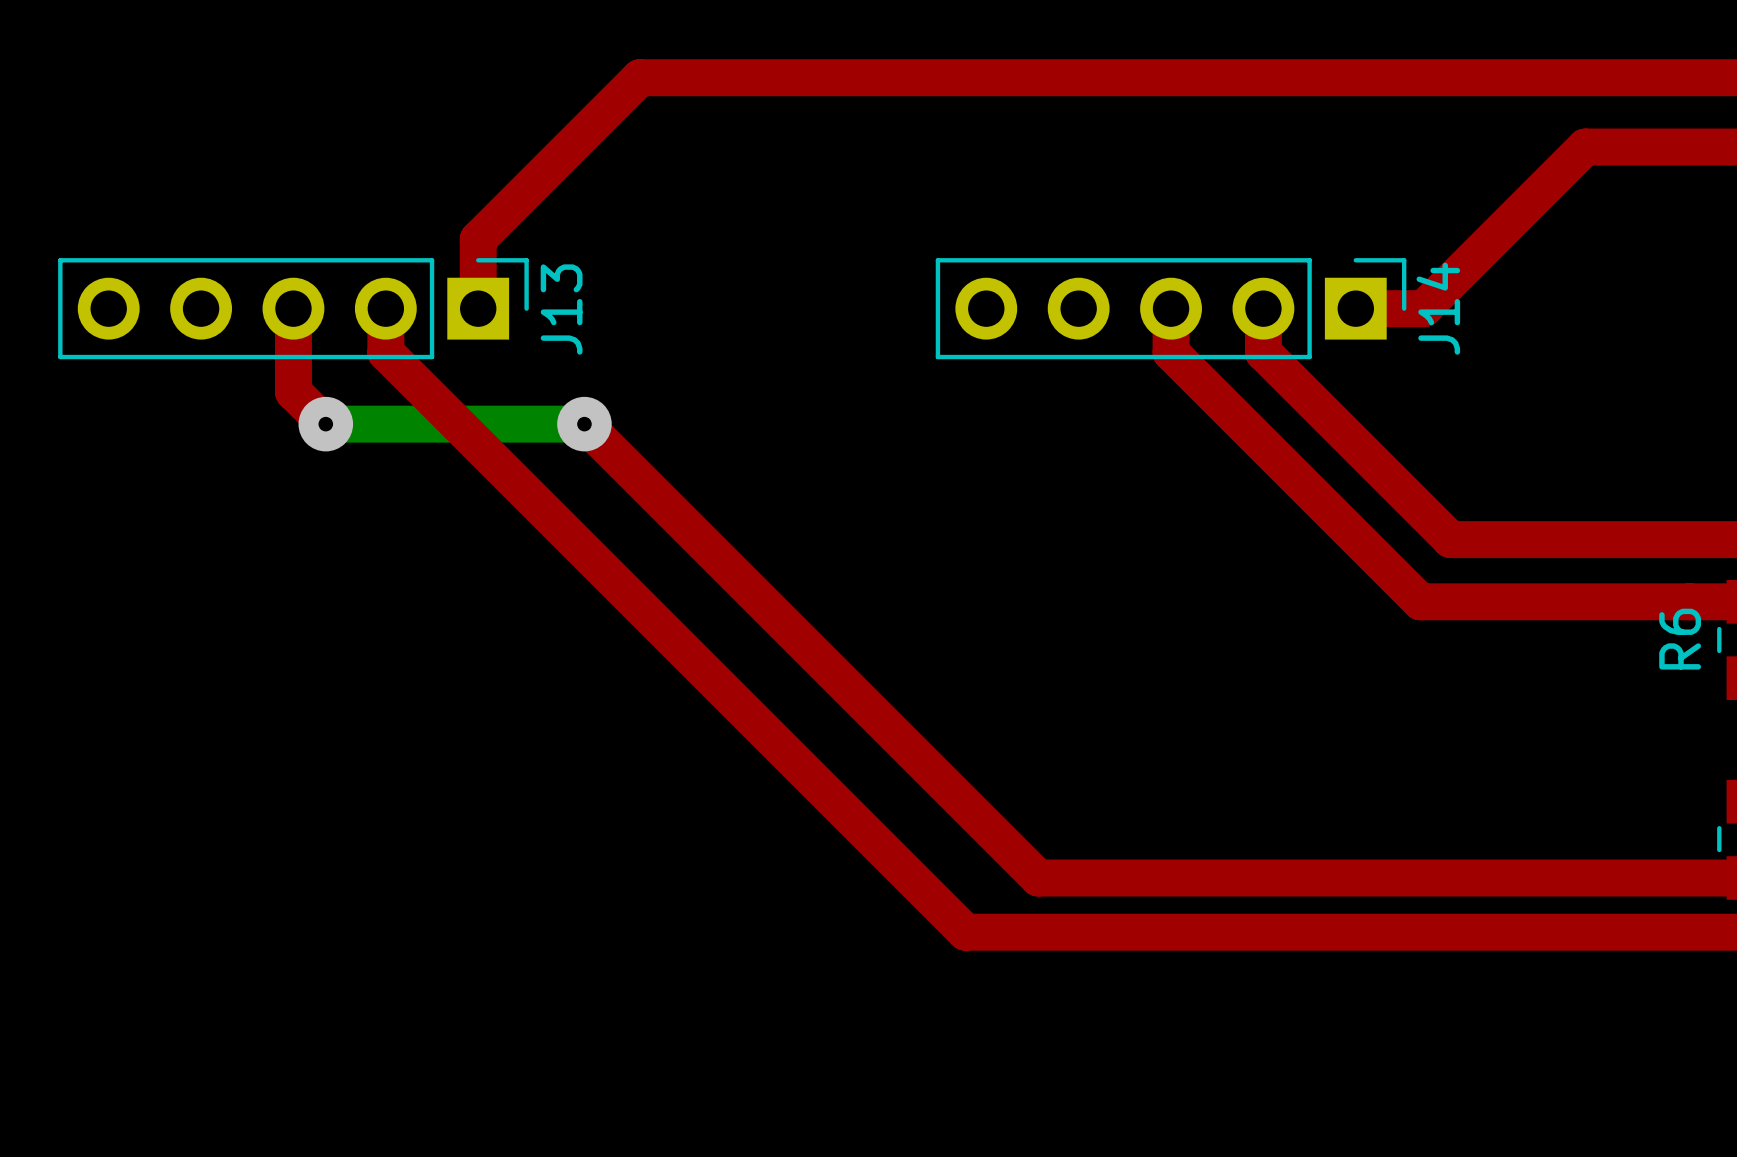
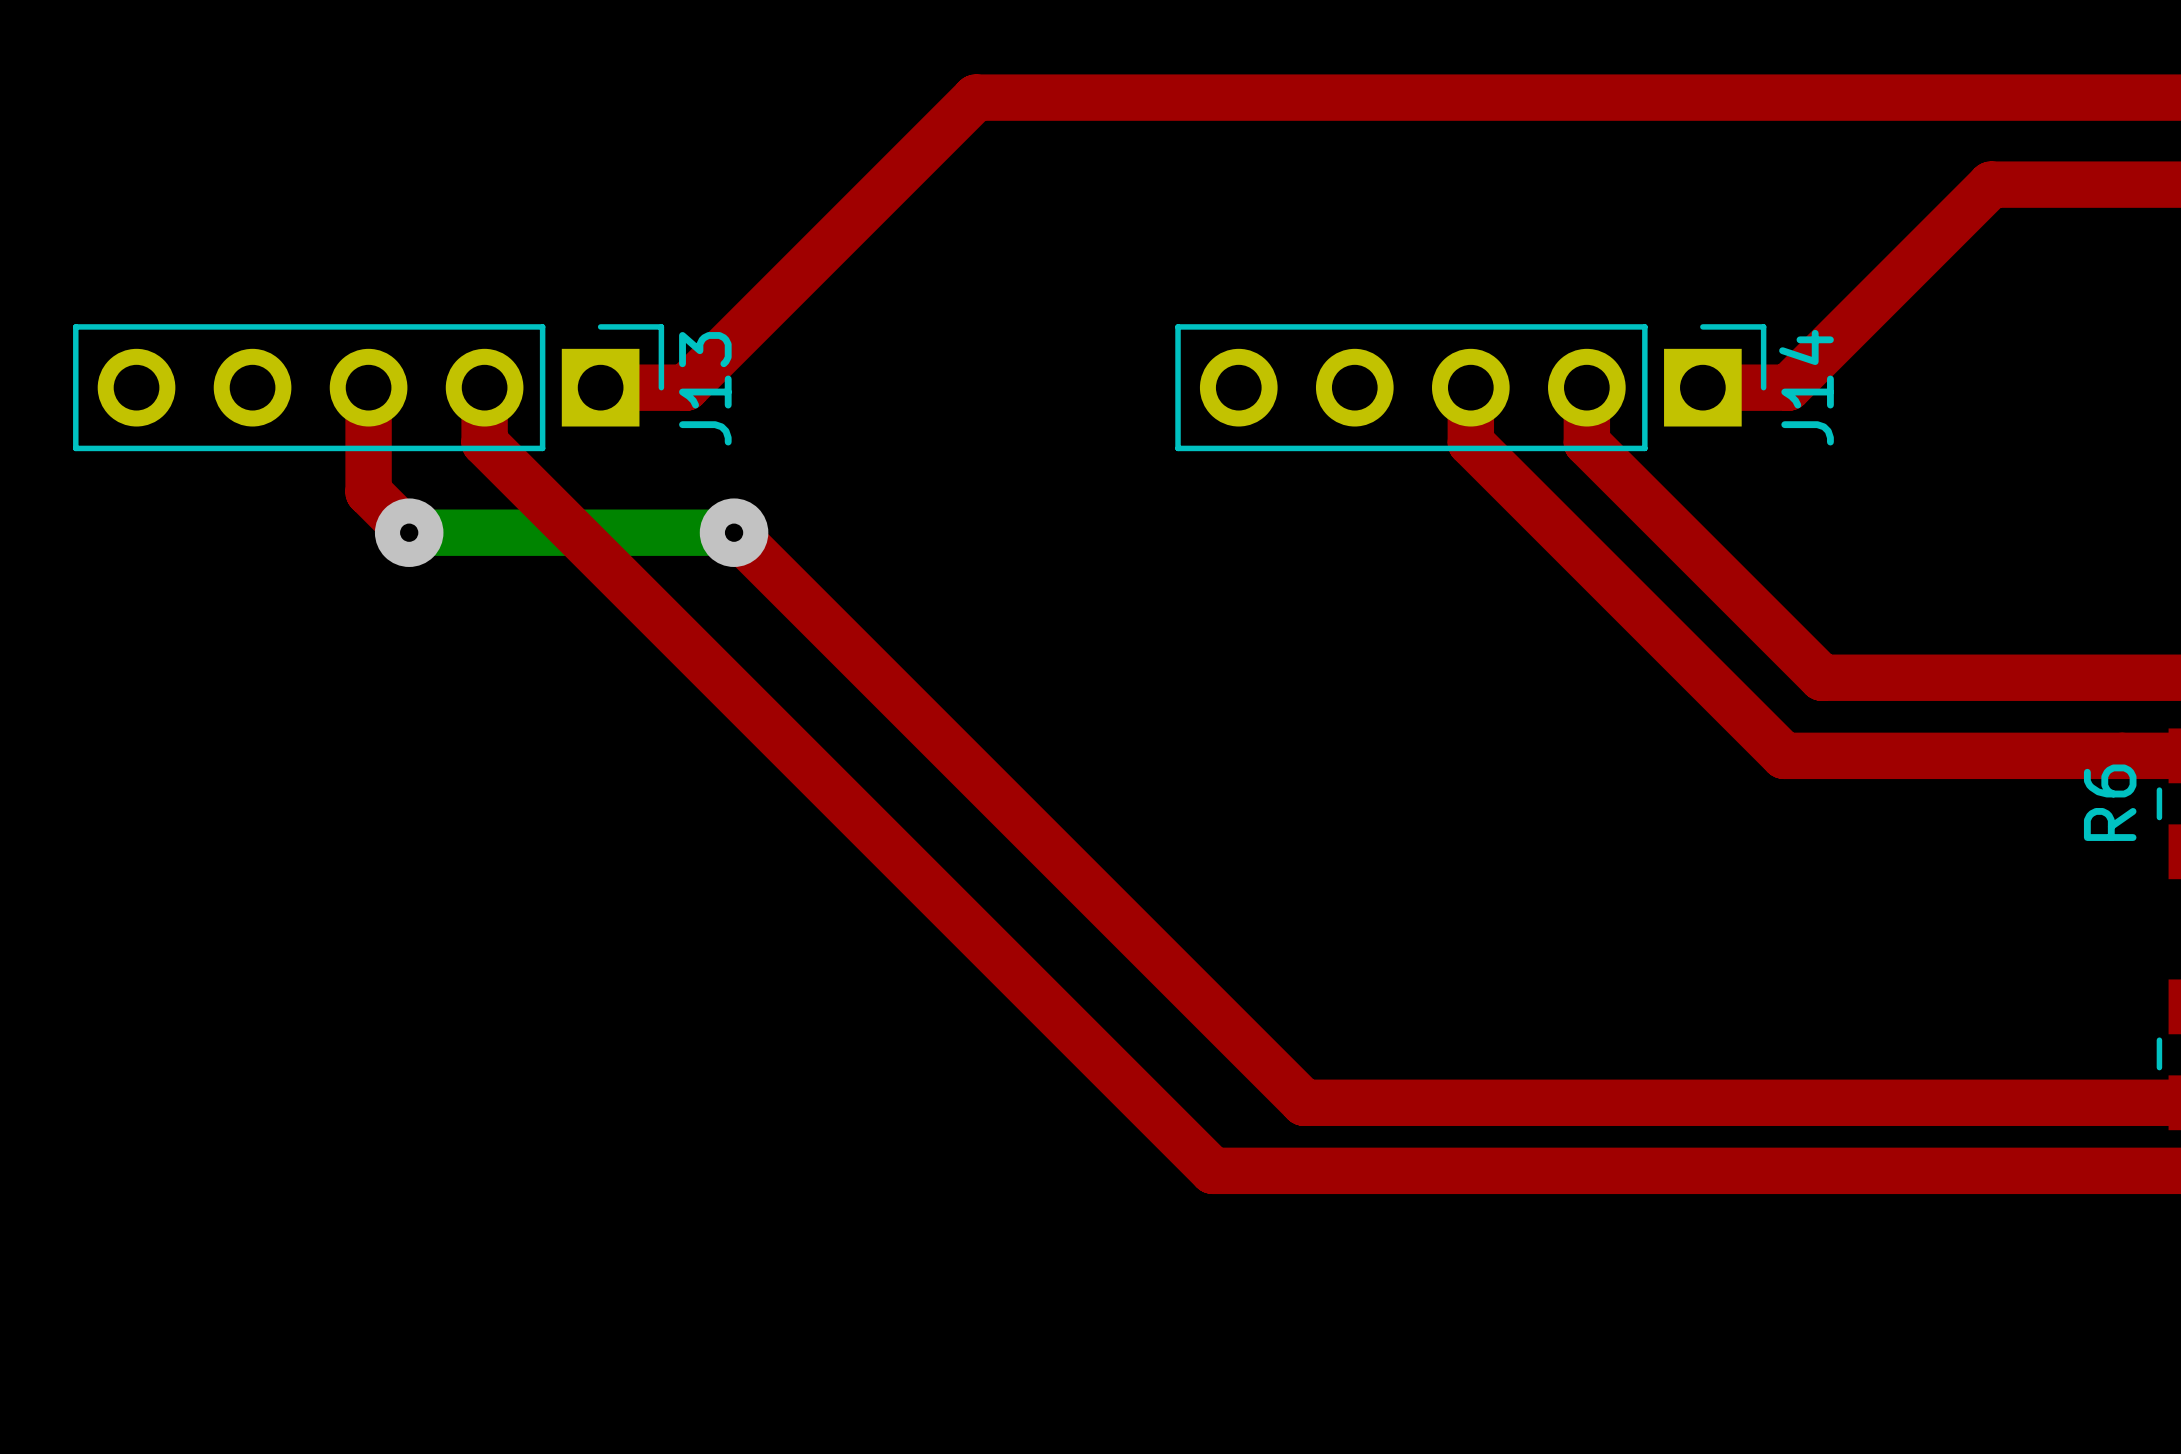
top track: (777, 77) (639, 77) (478, 239) (478, 308) -> (975, 97) (685, 387) (600, 387)

